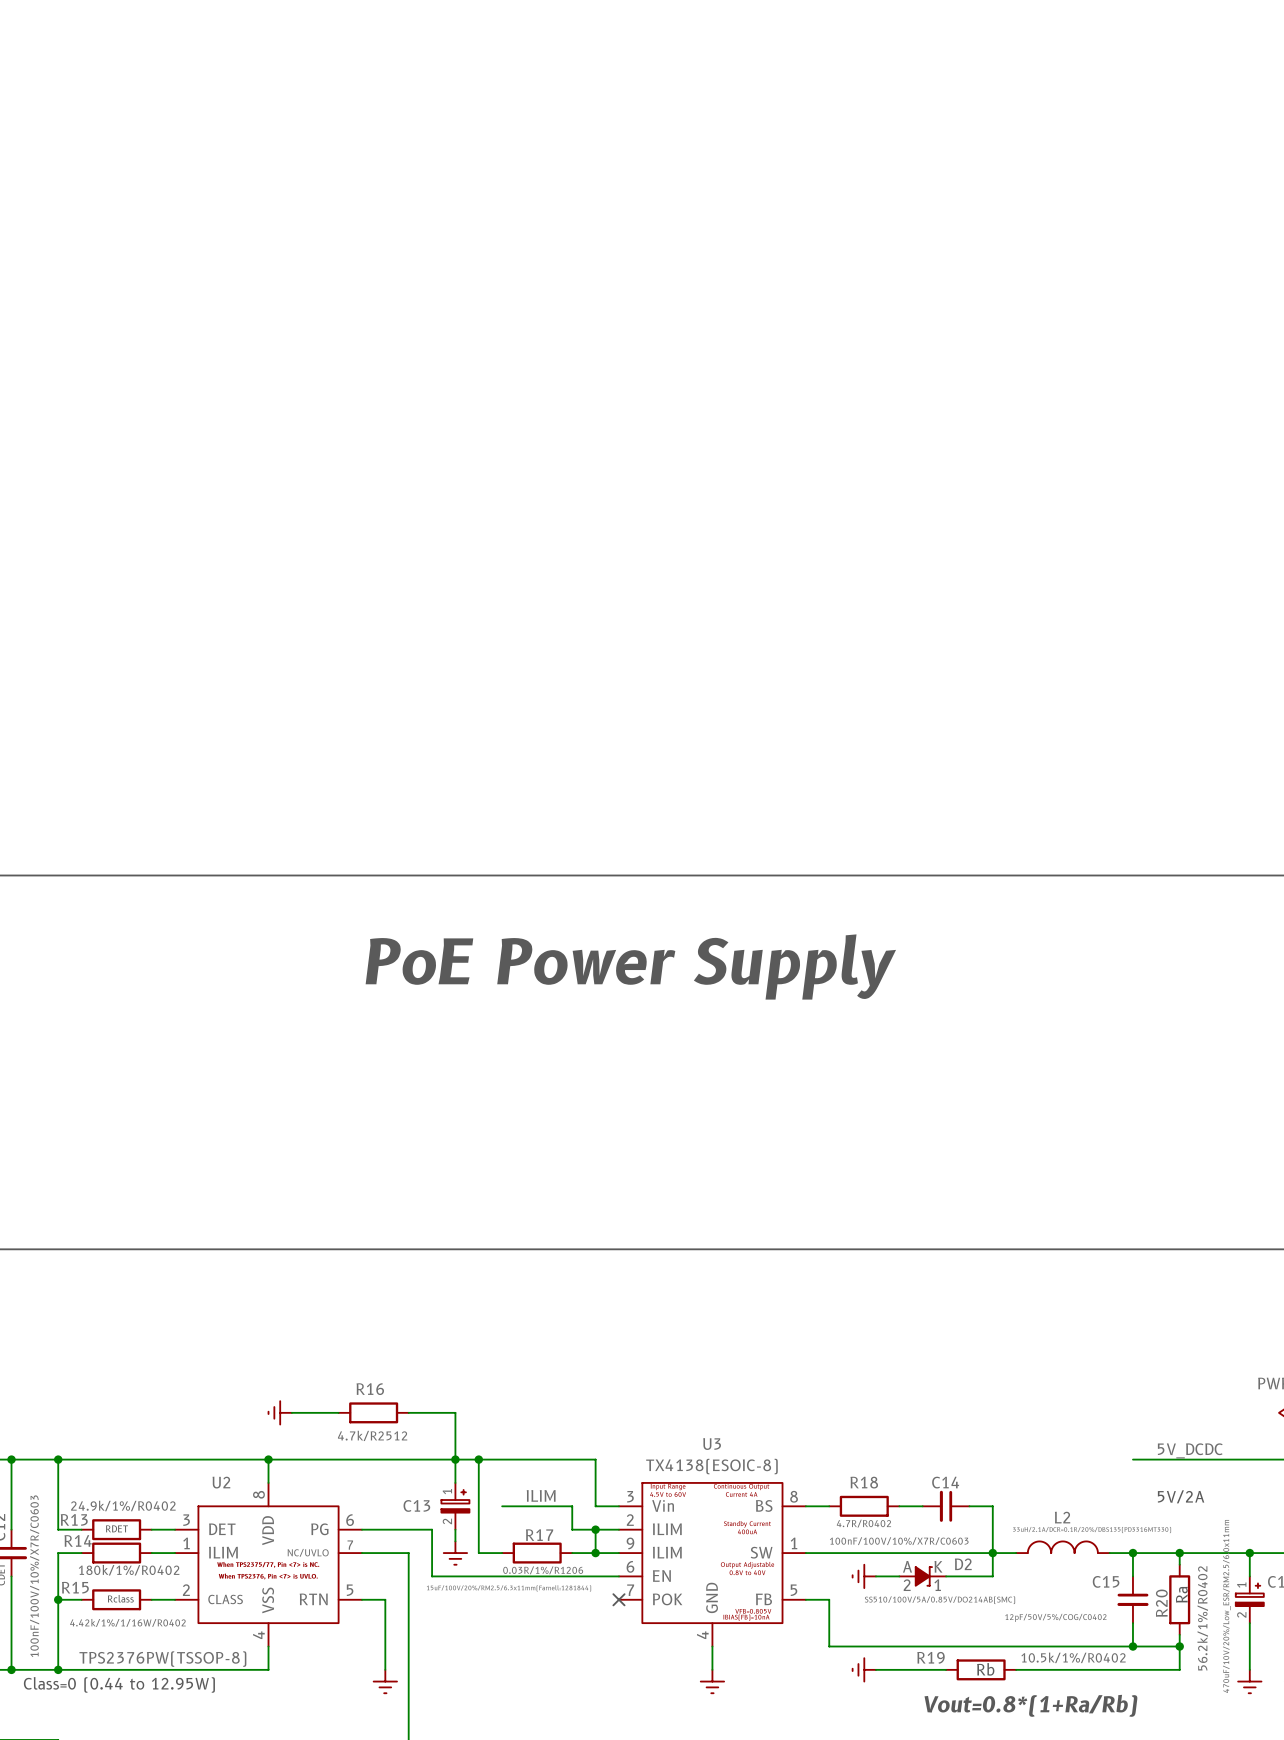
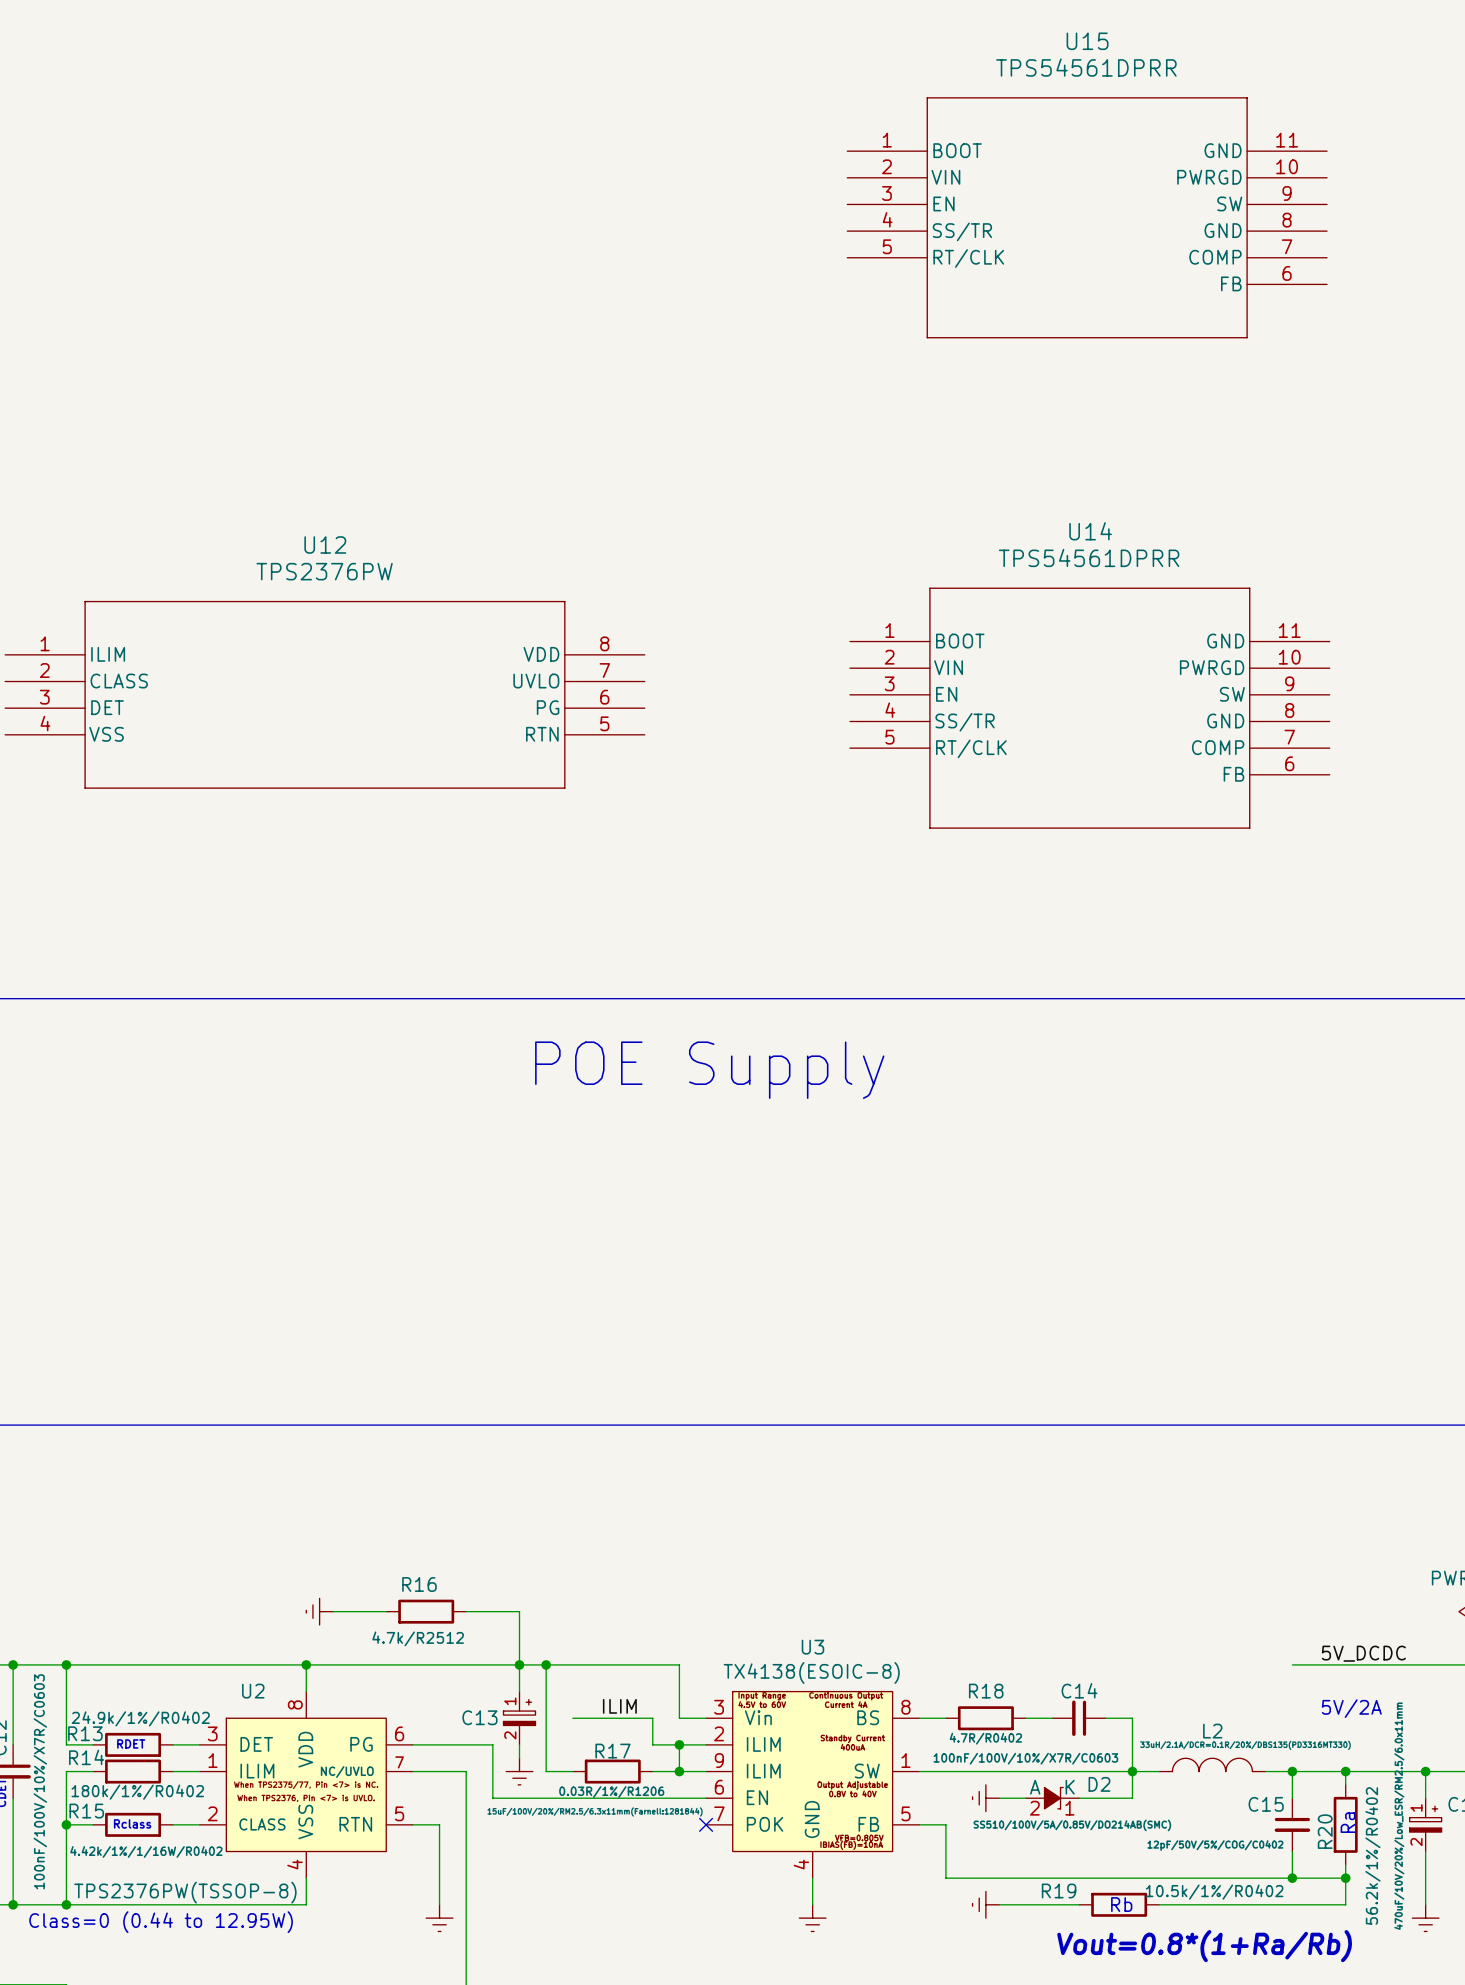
U15: none -> TPS54561DPRR (1087, 217)
U12: none -> TPS2376PW (324, 694)
U14: none -> TPS54561DPRR (1089, 708)
text: PoE Power Supply (630, 966) -> POE Supply (709, 1070)

